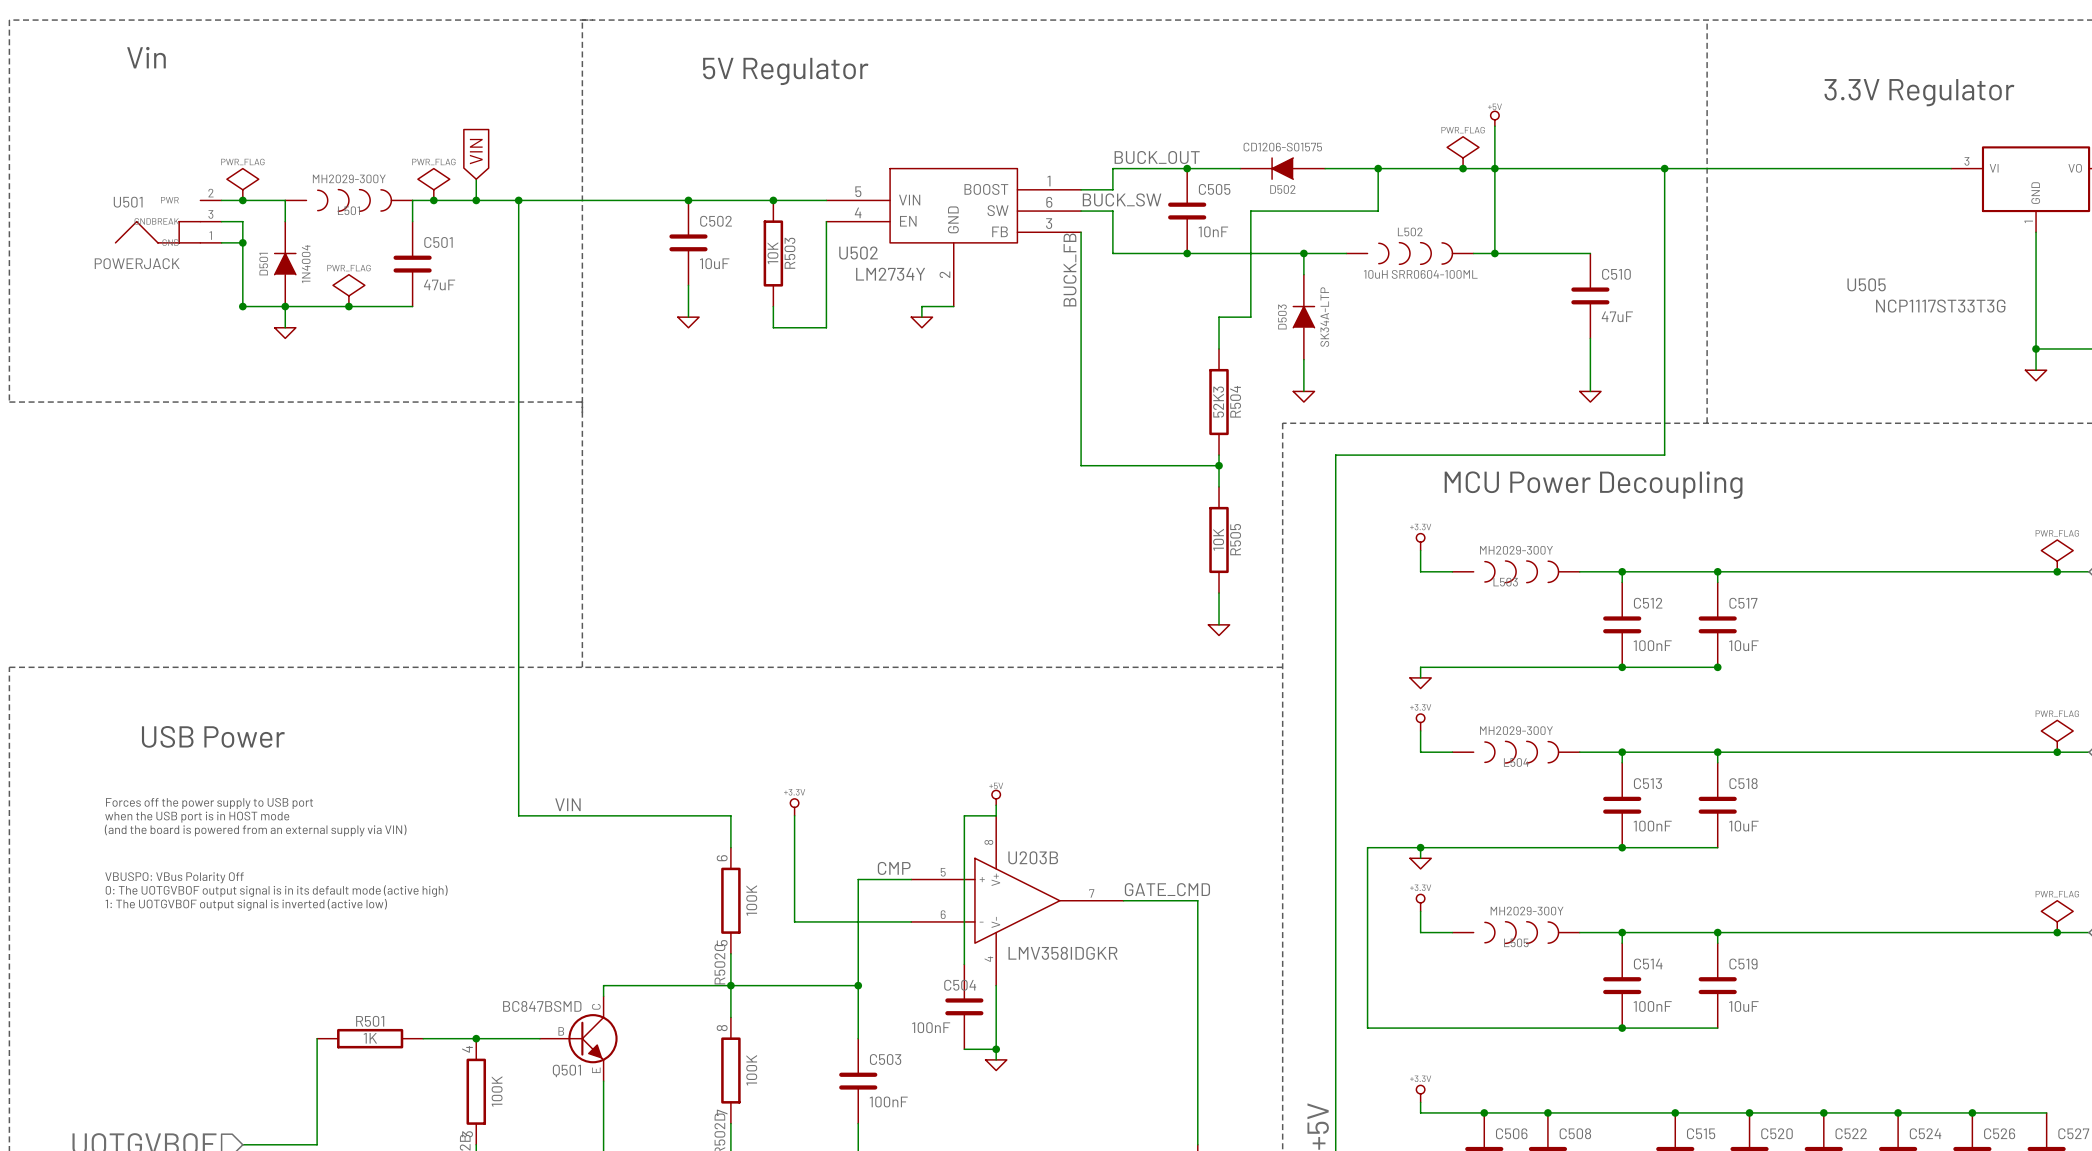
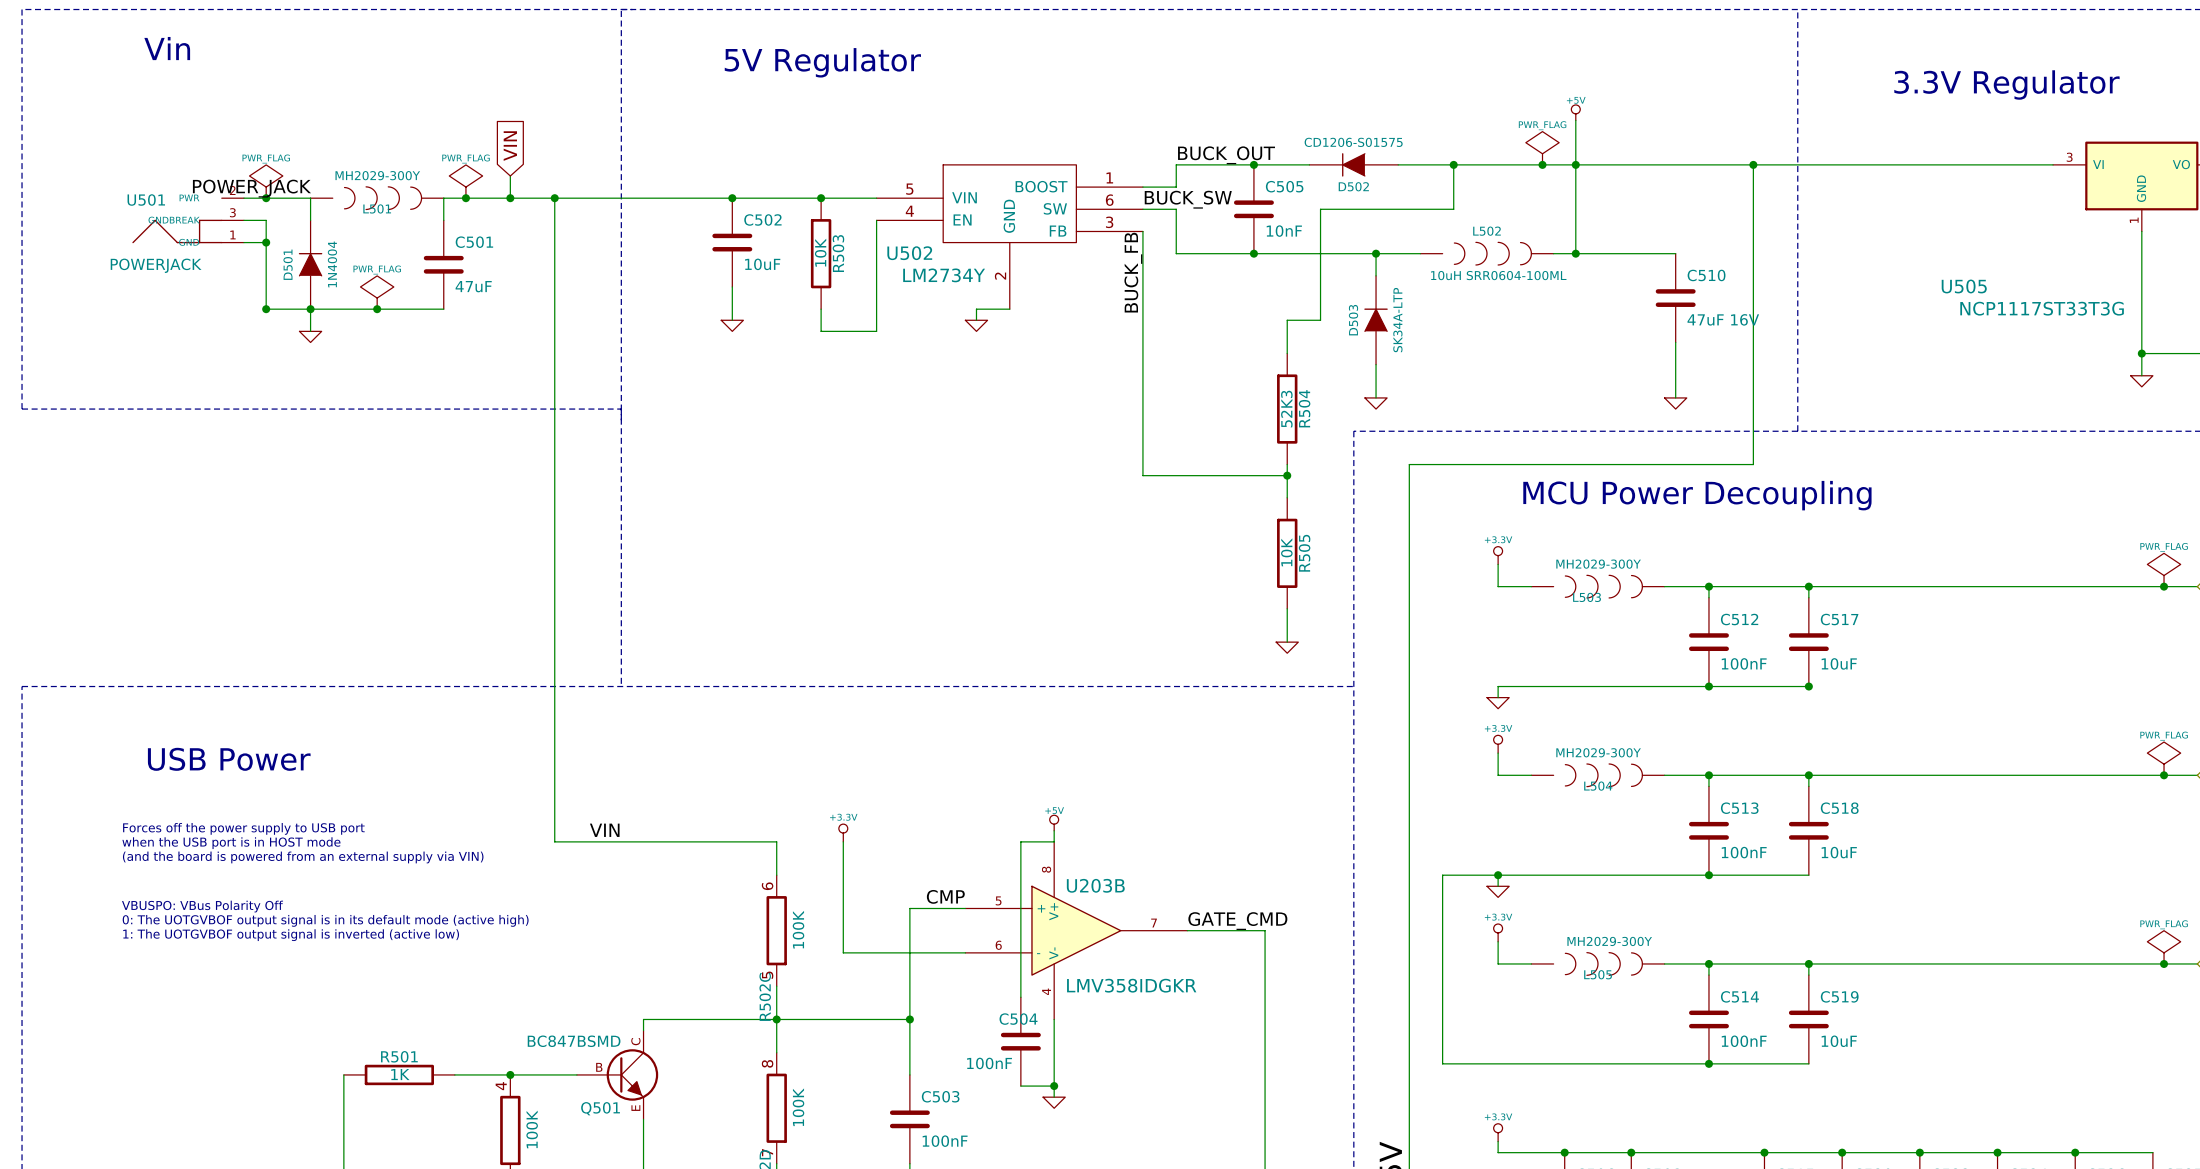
label: none -> POWER_JACK (251, 188)
C510 value: 47uF (1617, 316) -> 47uF 16V (1723, 319)

